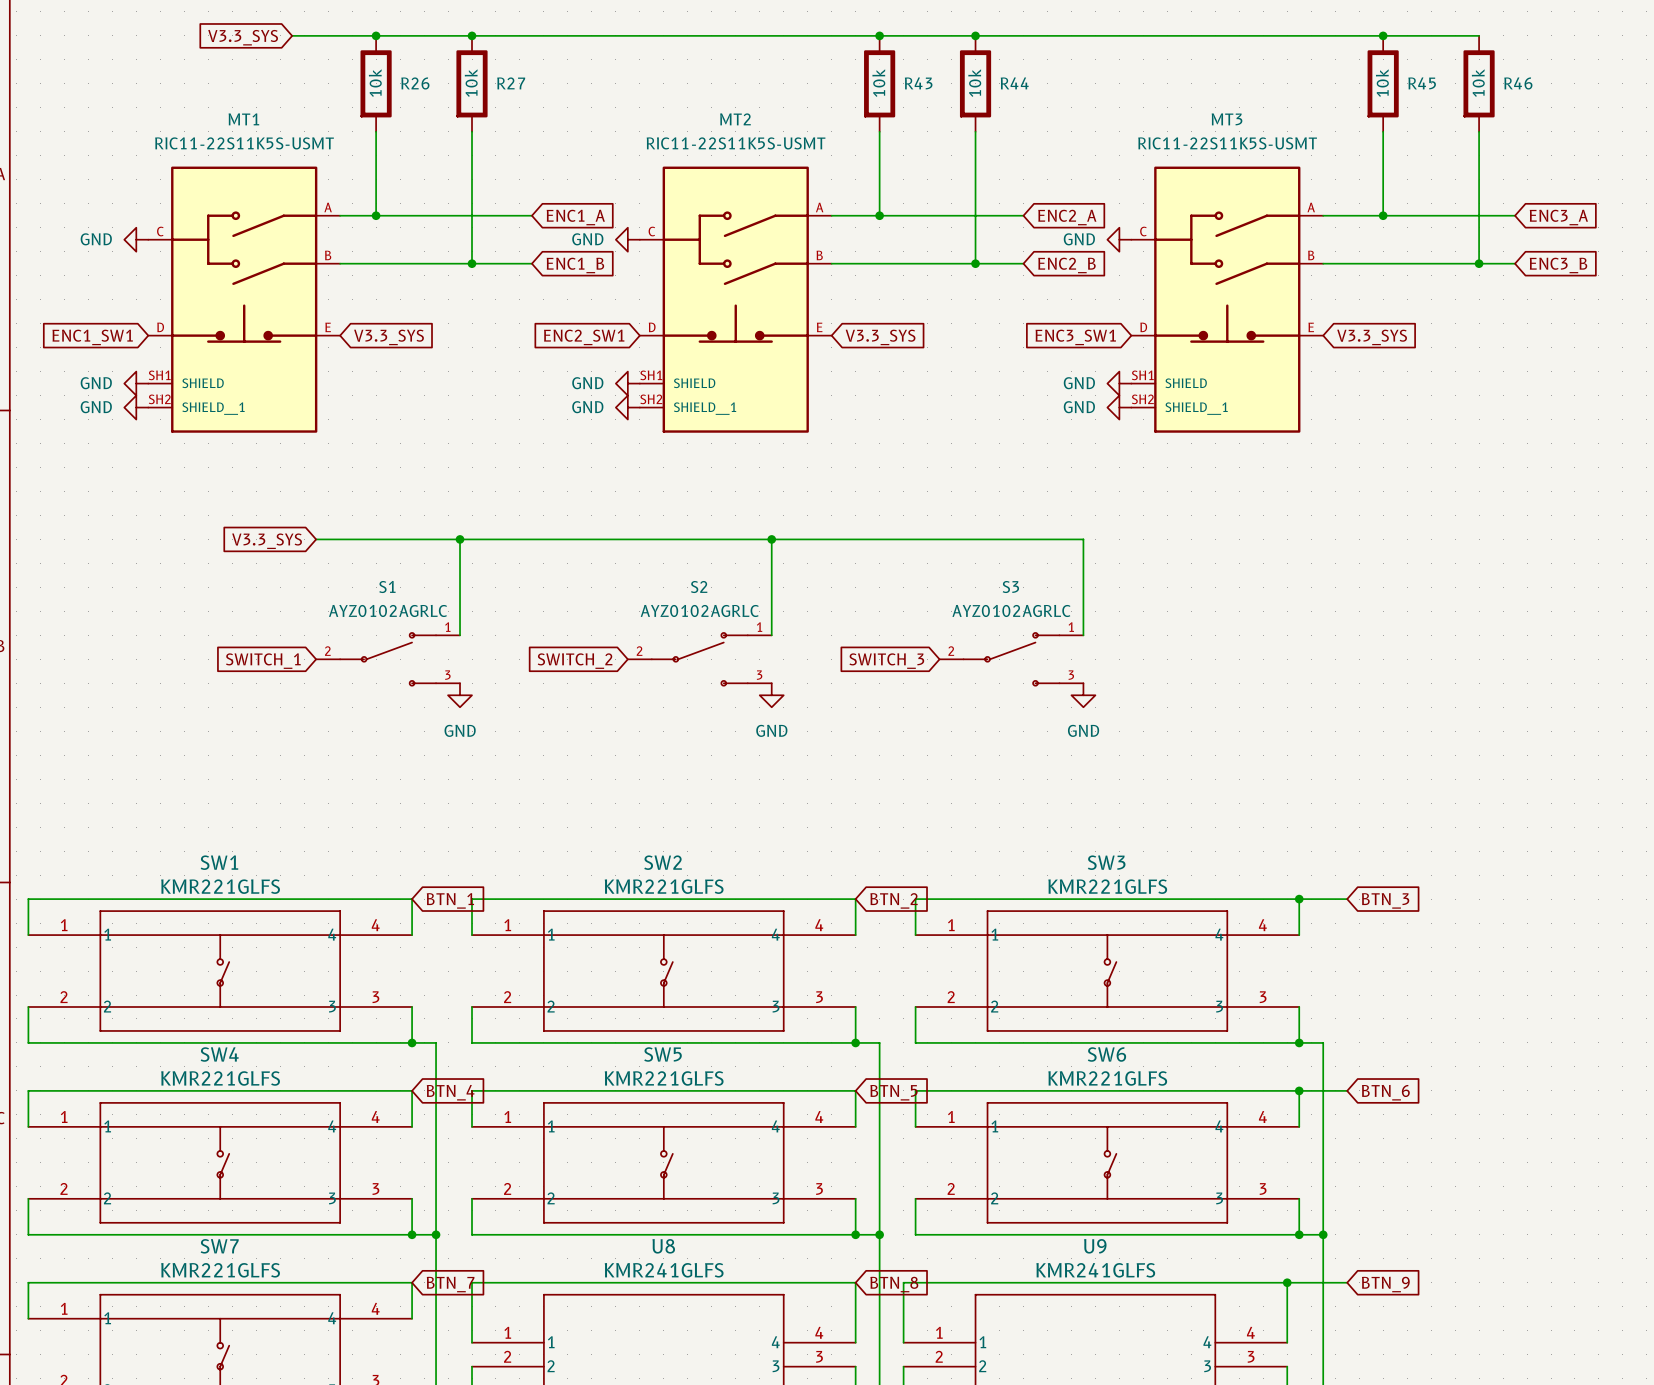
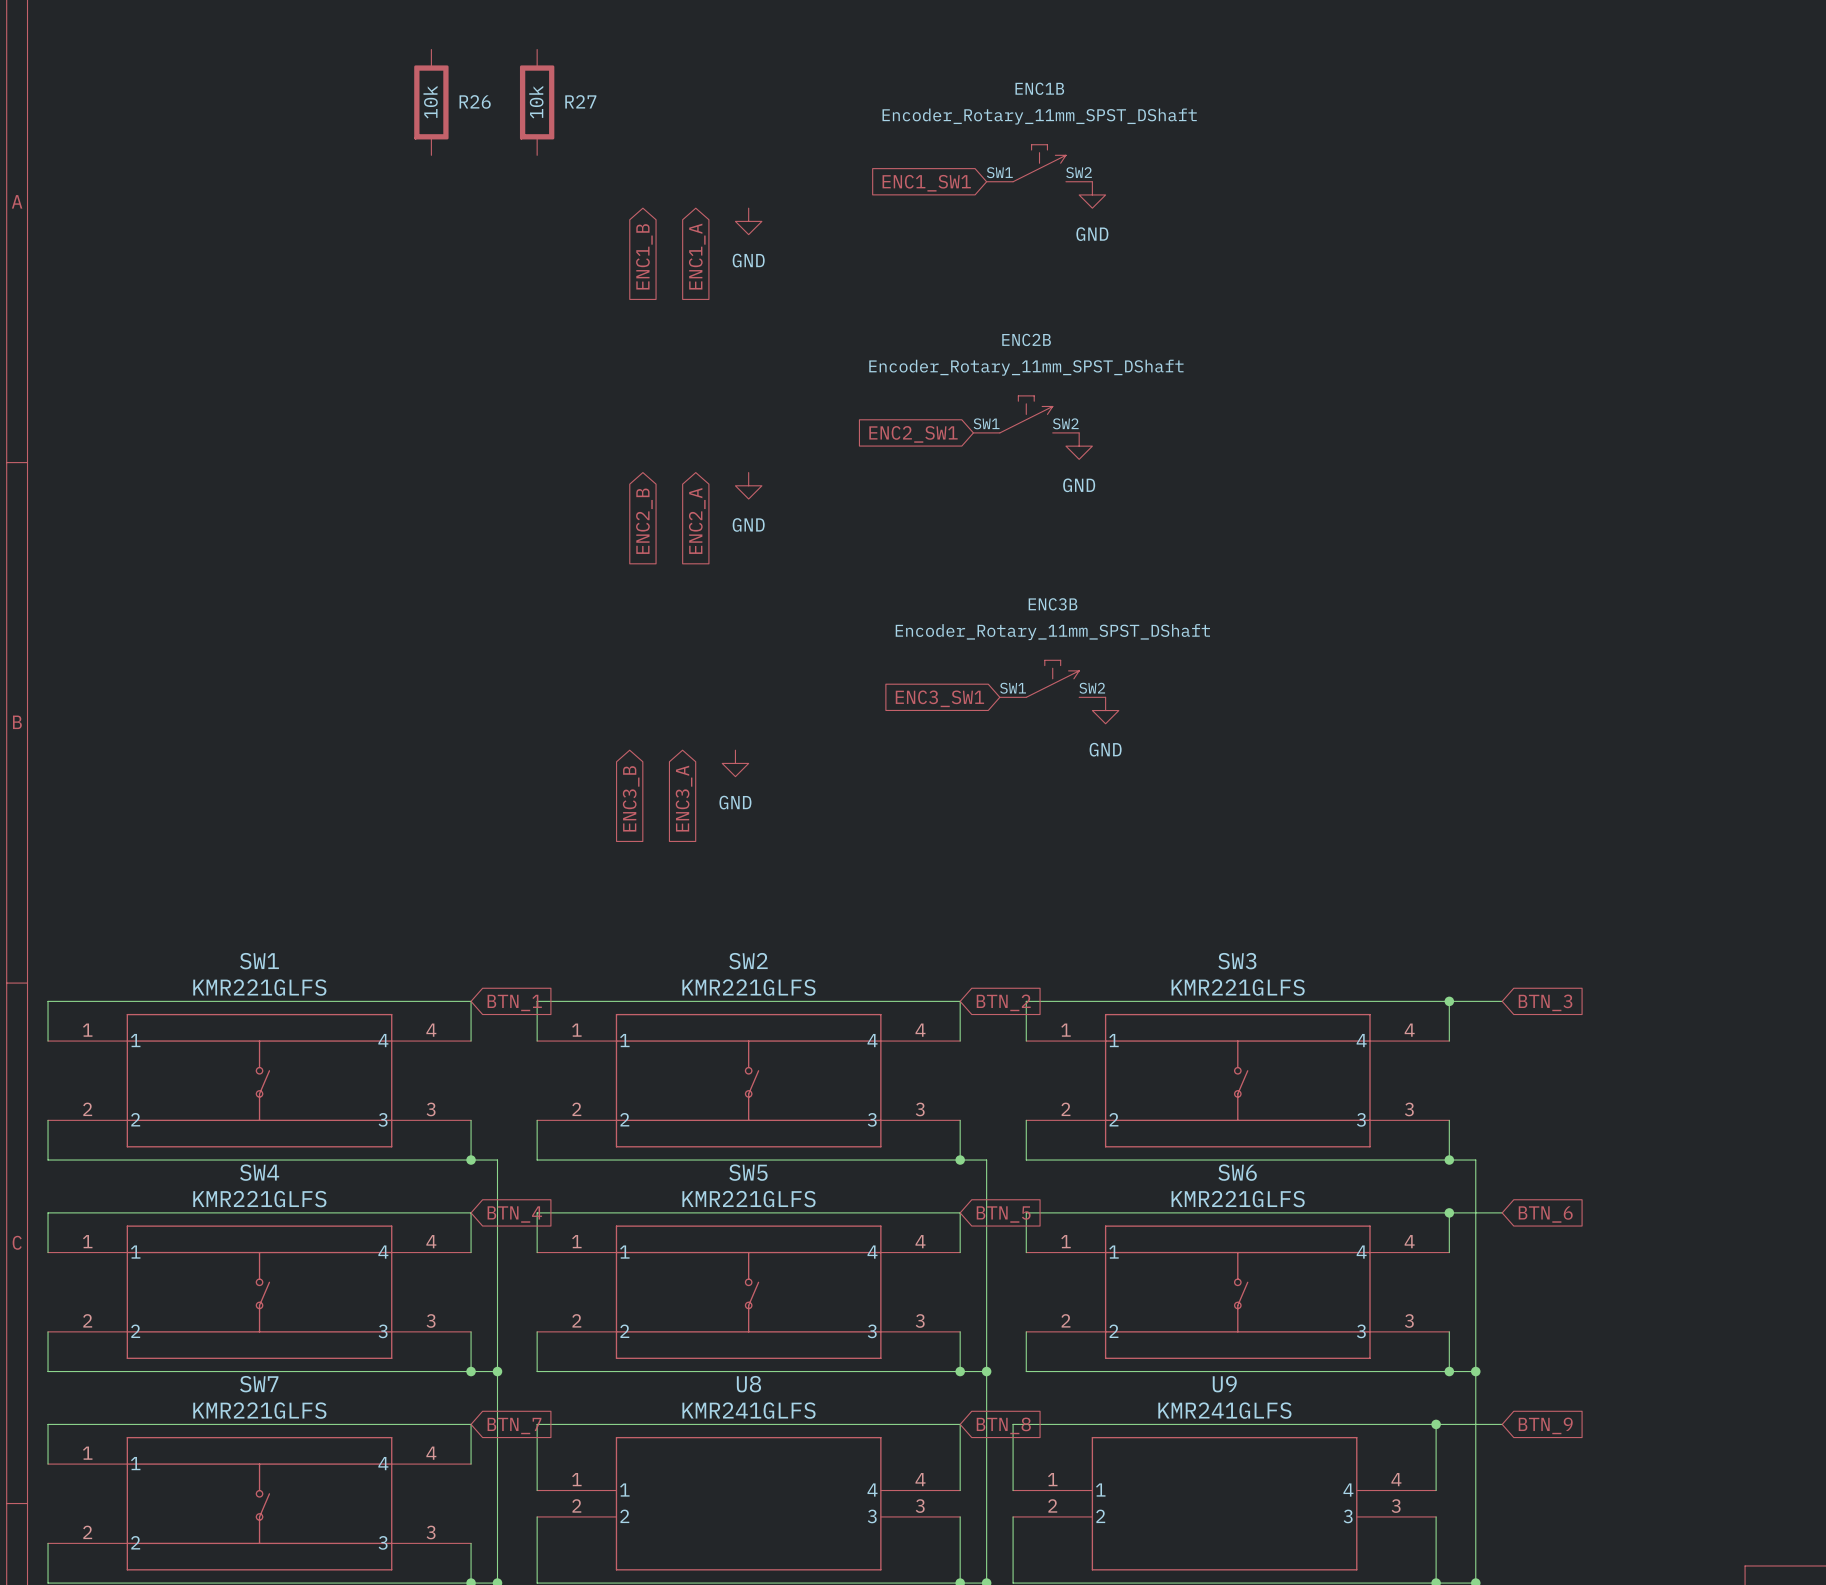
wire: (292, 35) (1479, 35) -> none
junction: (376, 35) -> none
junction: (472, 35) -> none
junction: (879, 35) -> none
junction: (975, 35) -> none
junction: (1383, 35) -> none
global label: V3.3_SYS (243, 37) -> none
R43: 10k (879, 83) -> none
R44: 10k (975, 83) -> none
R45: 10k (1383, 83) -> none
R46: 10k (1479, 83) -> none
wire: (376, 131) (376, 215) -> none
wire: (472, 131) (472, 263) -> none
wire: (879, 131) (879, 215) -> none
wire: (975, 131) (975, 263) -> none
wire: (1383, 131) (1383, 215) -> none
wire: (1479, 131) (1479, 263) -> none
ENC1B: none -> Encoder_Rotary_11mm_SPST_DShaft (1039, 163)
global label: none -> ENC1_SW1 (926, 183)
power symbol: none -> GND (1092, 194)
wire: (340, 215) (531, 215) -> none
junction: (376, 215) -> none
wire: (831, 215) (1023, 215) -> none
junction: (879, 215) -> none
wire: (1323, 215) (1515, 215) -> none
junction: (1383, 215) -> none
global label rotation: 0° (575, 217) -> 90° clockwise (697, 256)
global label: ENC2_A (1067, 217) -> none
global label: ENC3_A (1558, 217) -> none
power symbol: GND (136, 239) -> none
power symbol rotation: 0° (627, 239) -> 90° counterclockwise (748, 221)
power symbol position: GND (627, 239) -> GND (748, 221)
power symbol: GND (1119, 239) -> none
wire: (340, 263) (531, 263) -> none
junction: (472, 263) -> none
wire: (831, 263) (1023, 263) -> none
junction: (975, 263) -> none
wire: (1323, 263) (1515, 263) -> none
junction: (1479, 263) -> none
global label rotation: 0° (575, 265) -> 90° clockwise (644, 256)
global label: ENC2_B (1066, 265) -> none
global label: ENC3_B (1558, 265) -> none
MT1: RIC11-22S11K5S-USMT (244, 299) -> none
MT2: RIC11-22S11K5S-USMT (735, 299) -> none
MT3: RIC11-22S11K5S-USMT (1227, 299) -> none
global label: ENC1_SW1 (92, 337) -> none
global label: V3.3_SYS (389, 337) -> none
global label position: ENC2_SW1 (584, 337) -> ENC2_SW1 (913, 434)
global label: V3.3_SYS (880, 337) -> none
global label: ENC3_SW1 (1075, 337) -> none
global label: V3.3_SYS (1372, 337) -> none
ENC2B: none -> Encoder_Rotary_11mm_SPST_DShaft (1026, 414)
power symbol: GND (136, 383) -> none
power symbol: GND (627, 383) -> none
power symbol: GND (1119, 383) -> none
power symbol: none -> GND (1079, 446)
power symbol: GND (136, 407) -> none
power symbol: GND (627, 407) -> none
power symbol: GND (1119, 407) -> none
power symbol: none -> GND (748, 485)
global label: none -> ENC2_B (644, 521)
global label: none -> ENC2_A (697, 520)
wire: (316, 539) (1083, 539) (1083, 635) -> none
wire: (460, 539) (460, 635) -> none
junction: (460, 539) -> none
wire: (771, 539) (771, 635) -> none
junction: (771, 539) -> none
global label: V3.3_SYS (267, 541) -> none
ENC3B: none -> Encoder_Rotary_11mm_SPST_DShaft (1052, 678)
global label: none -> ENC3_SW1 (939, 698)
power symbol: none -> GND (1105, 710)
S1: AYZ0102AGRLC (388, 659) -> none
S2: AYZ0102AGRLC (699, 659) -> none
S3: AYZ0102AGRLC (1011, 659) -> none
global label: SWITCH_1 (263, 661) -> none
global label: SWITCH_2 (575, 661) -> none
global label: SWITCH_3 (886, 661) -> none
power symbol: none -> GND (735, 763)
power symbol: GND (460, 695) -> none
power symbol: GND (771, 695) -> none
power symbol: GND (1083, 695) -> none
global label: none -> ENC3_B (631, 798)
global label: none -> ENC3_A (684, 798)

